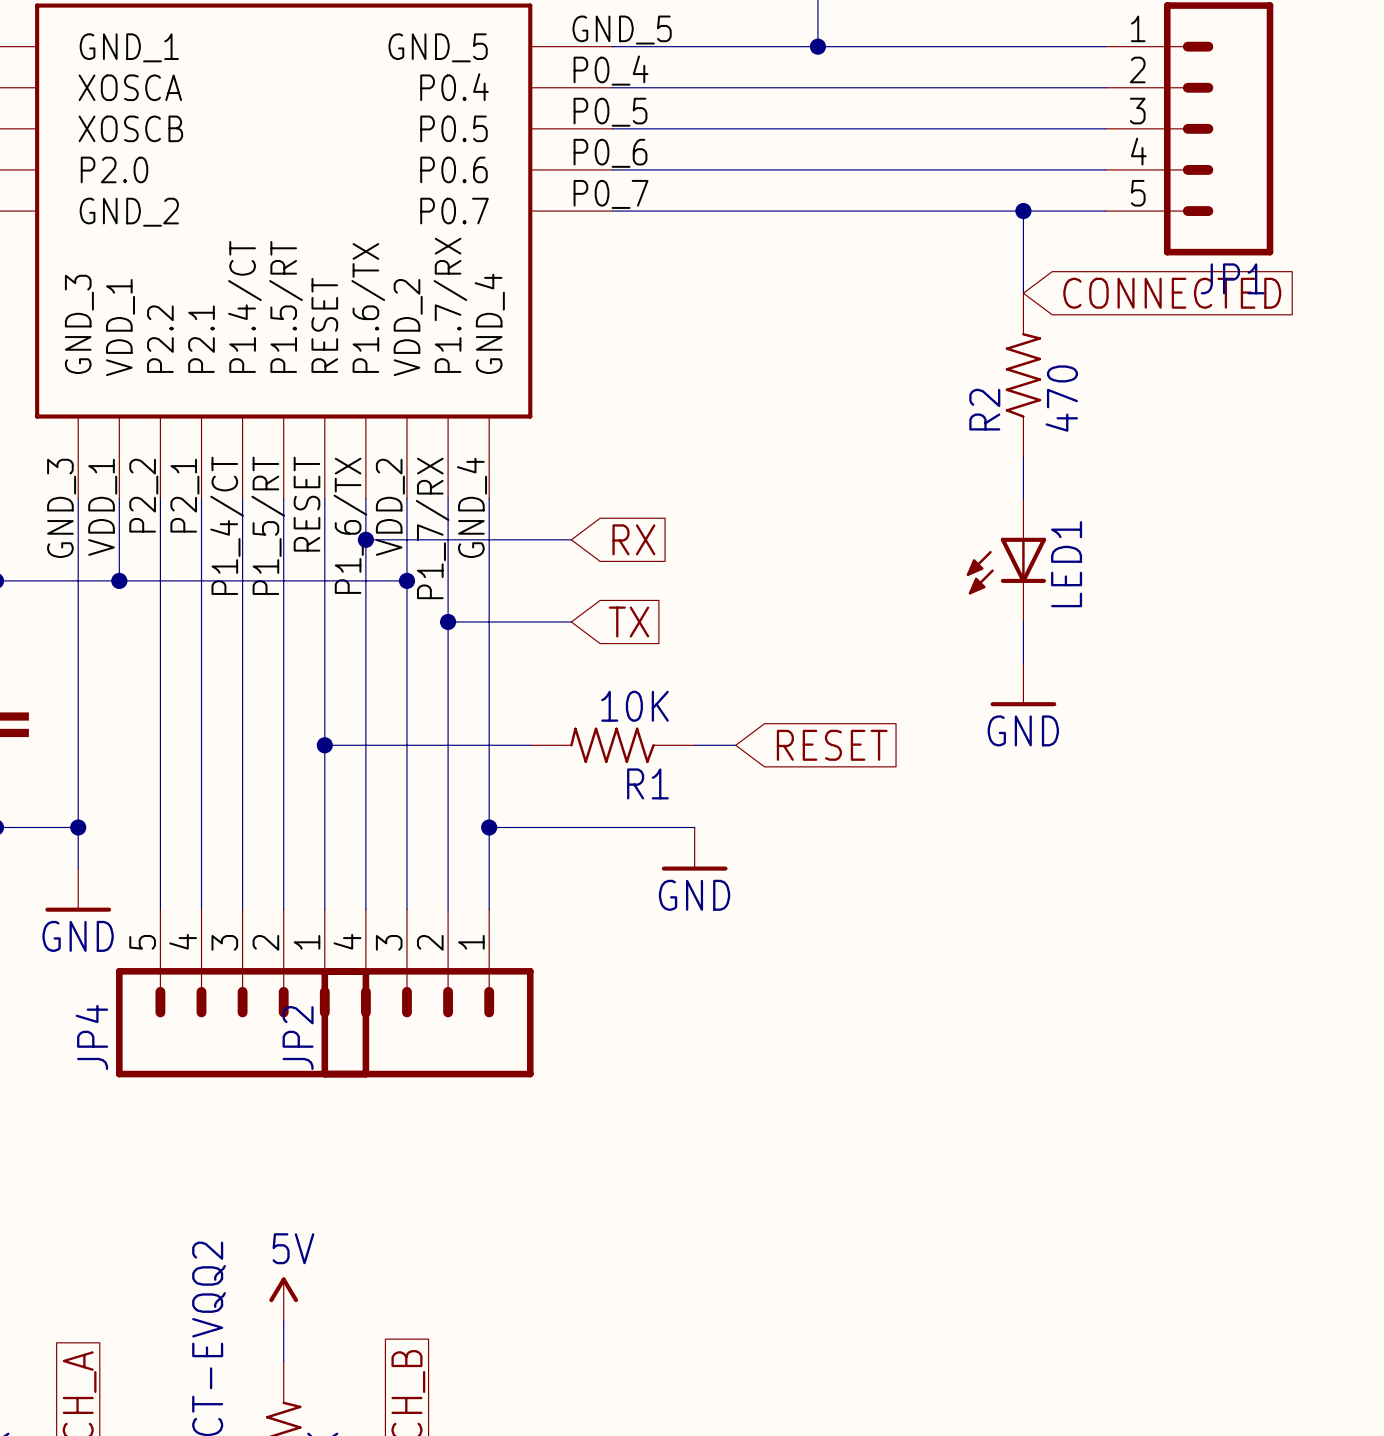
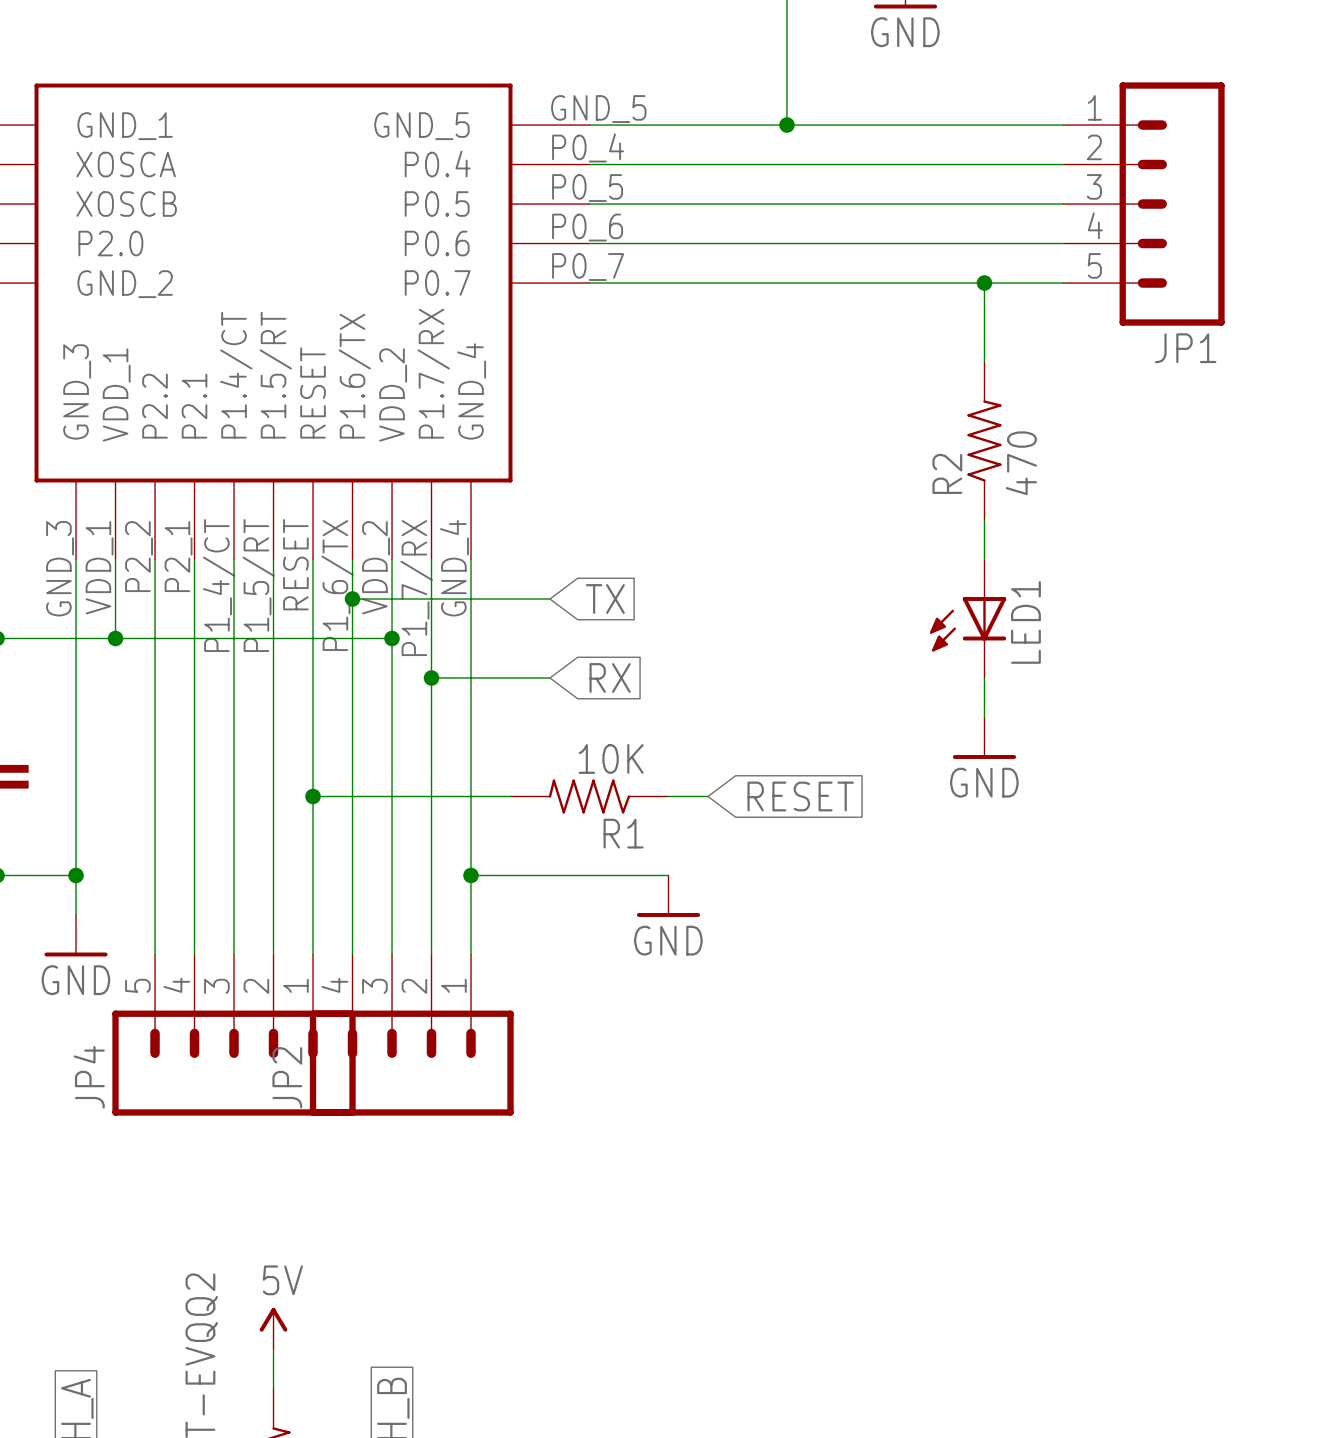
global label: CONNECTED (1172, 293) -> none
global label: RX (633, 539) -> TX (605, 599)
global label: TX (628, 622) -> RX (610, 678)

